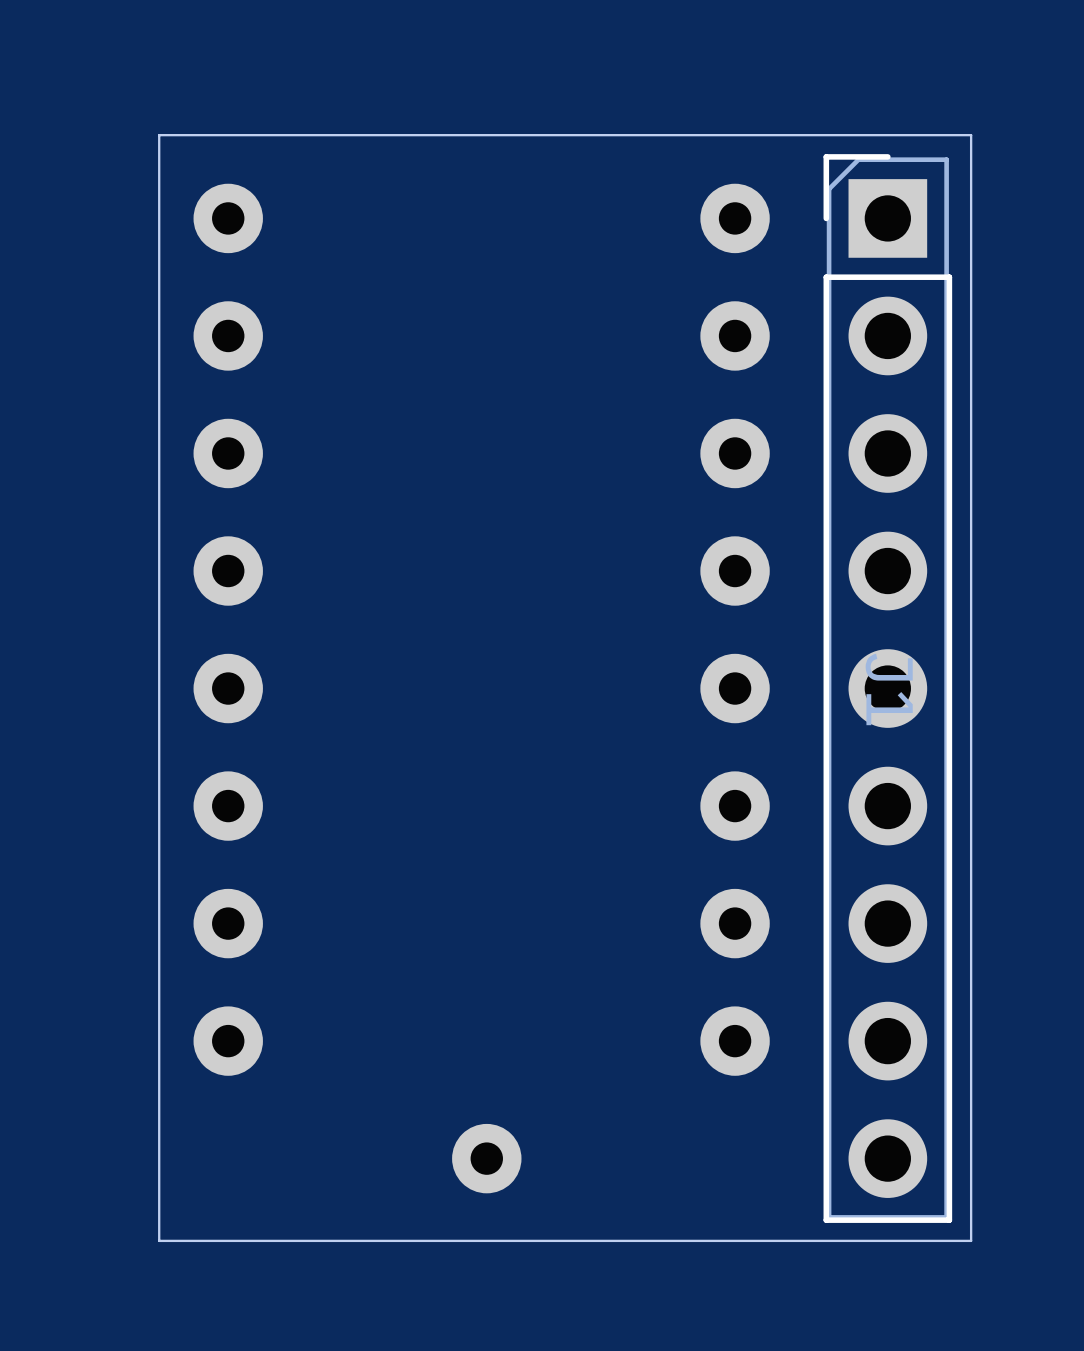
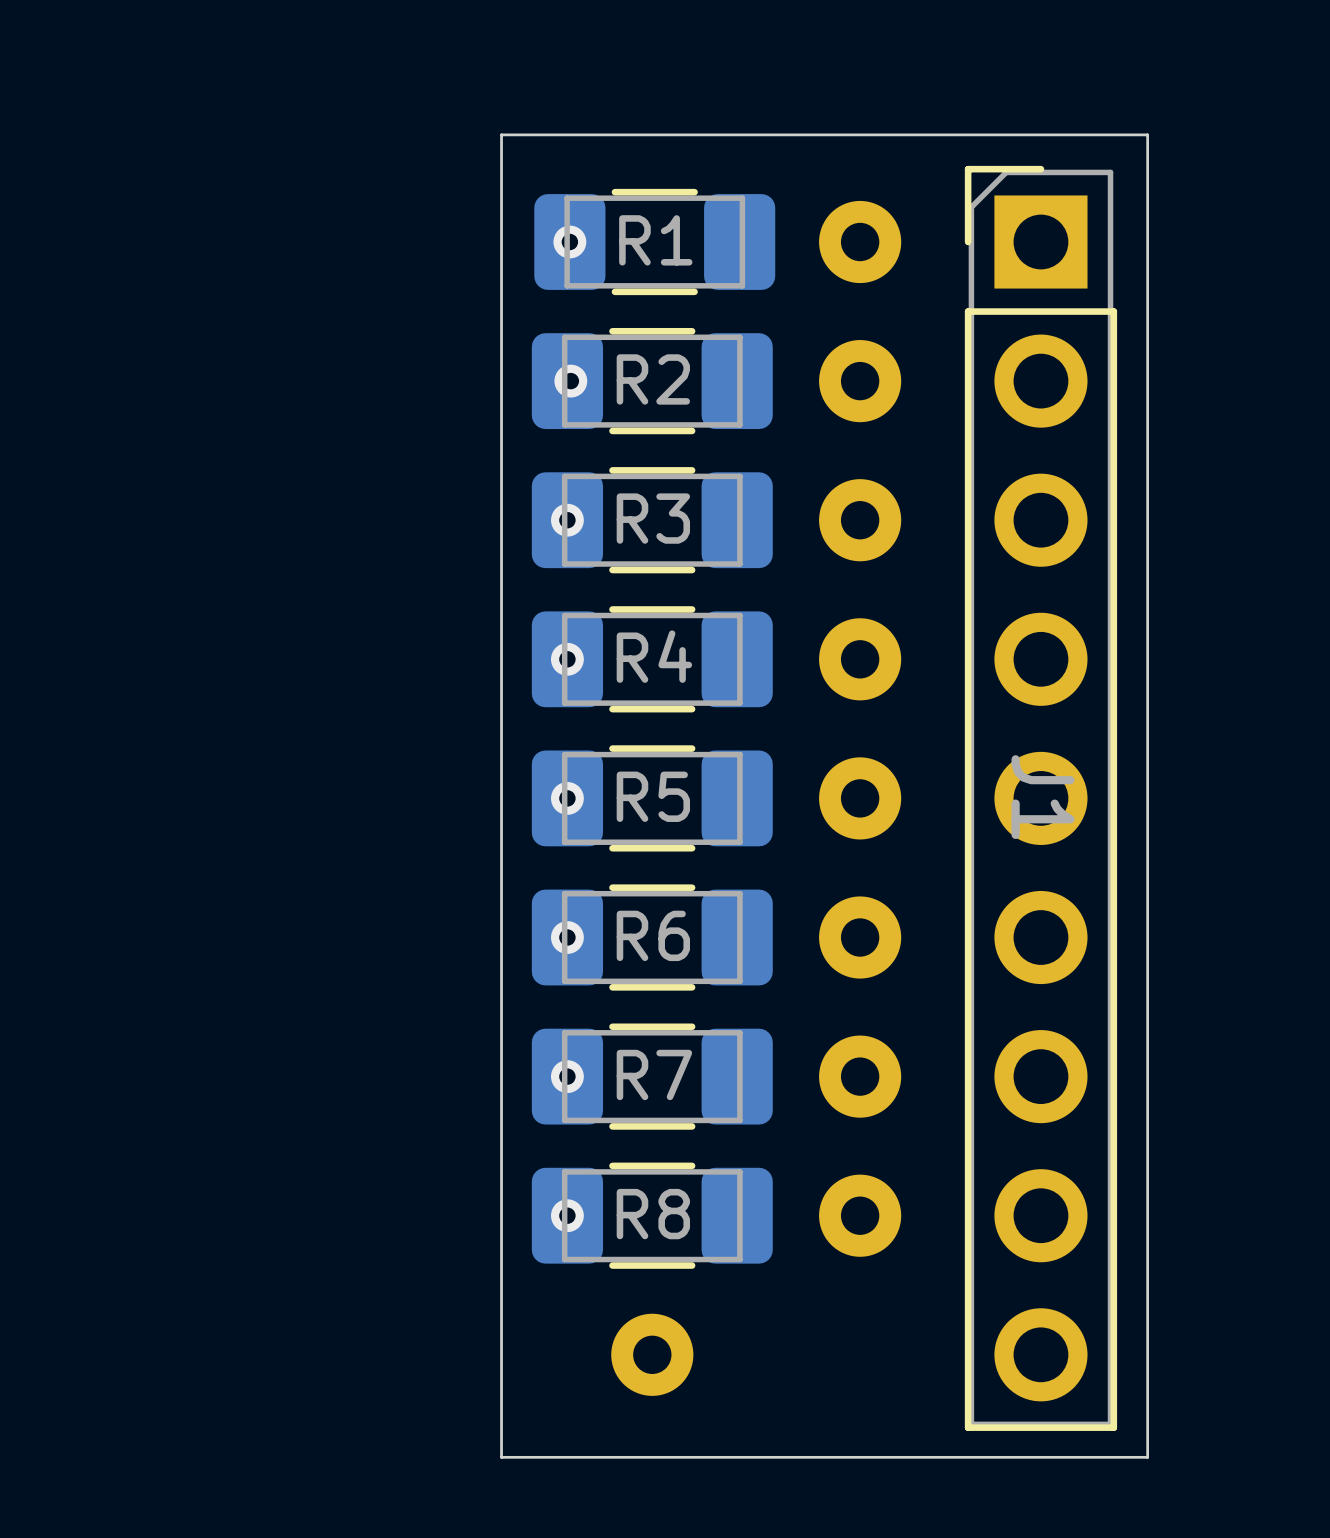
board edge: (971, 135) (159, 135) (159, 1240) (971, 1240) (971, 135) -> (1147, 134) (1147, 1457) (501, 1457) (501, 134) (1147, 134)
part: (228, 218) -> none
via: none -> (569, 242)
R1: none -> (654, 242)
part: (228, 335) -> none
via: none -> (570, 381)
R2: none -> (652, 381)
part: (228, 453) -> none
via: none -> (567, 520)
R3: none -> (652, 520)
part: (228, 571) -> none
via: none -> (567, 659)
R4: none -> (652, 659)
part: (228, 688) -> none
via: none -> (567, 798)
R5: none -> (652, 798)
part: (228, 806) -> none
via: none -> (567, 937)
R6: none -> (652, 937)
part: (228, 923) -> none
via: none -> (567, 1076)
R7: none -> (652, 1076)
part: (228, 1041) -> none
via: none -> (567, 1215)
R8: none -> (652, 1215)
part position: (486, 1158) -> (652, 1354)

